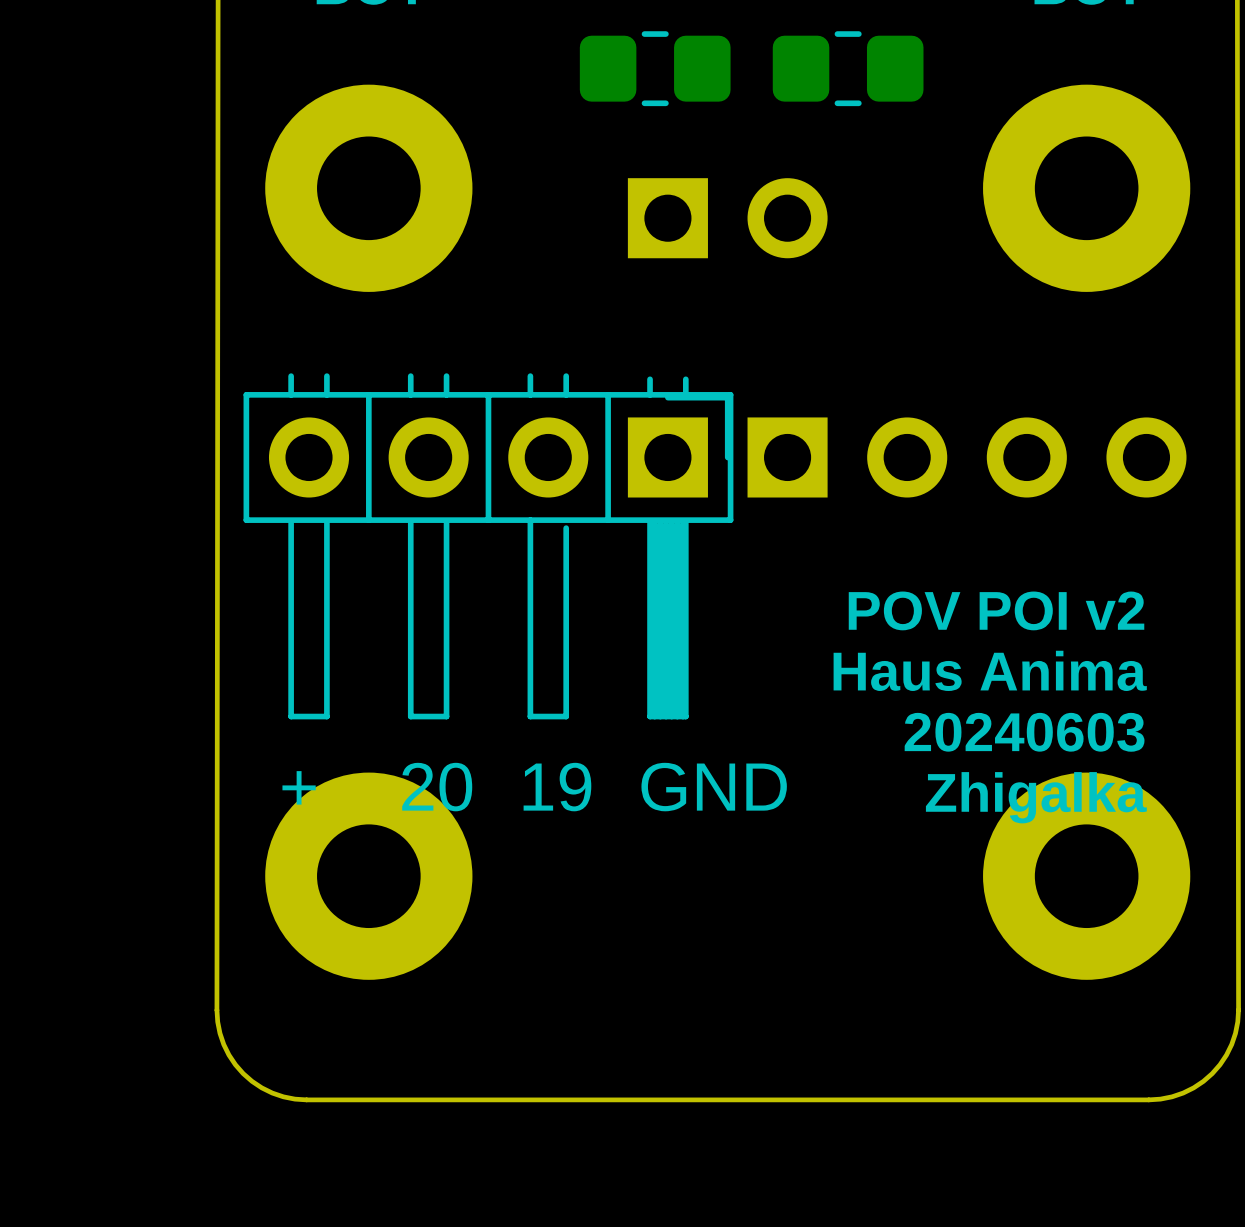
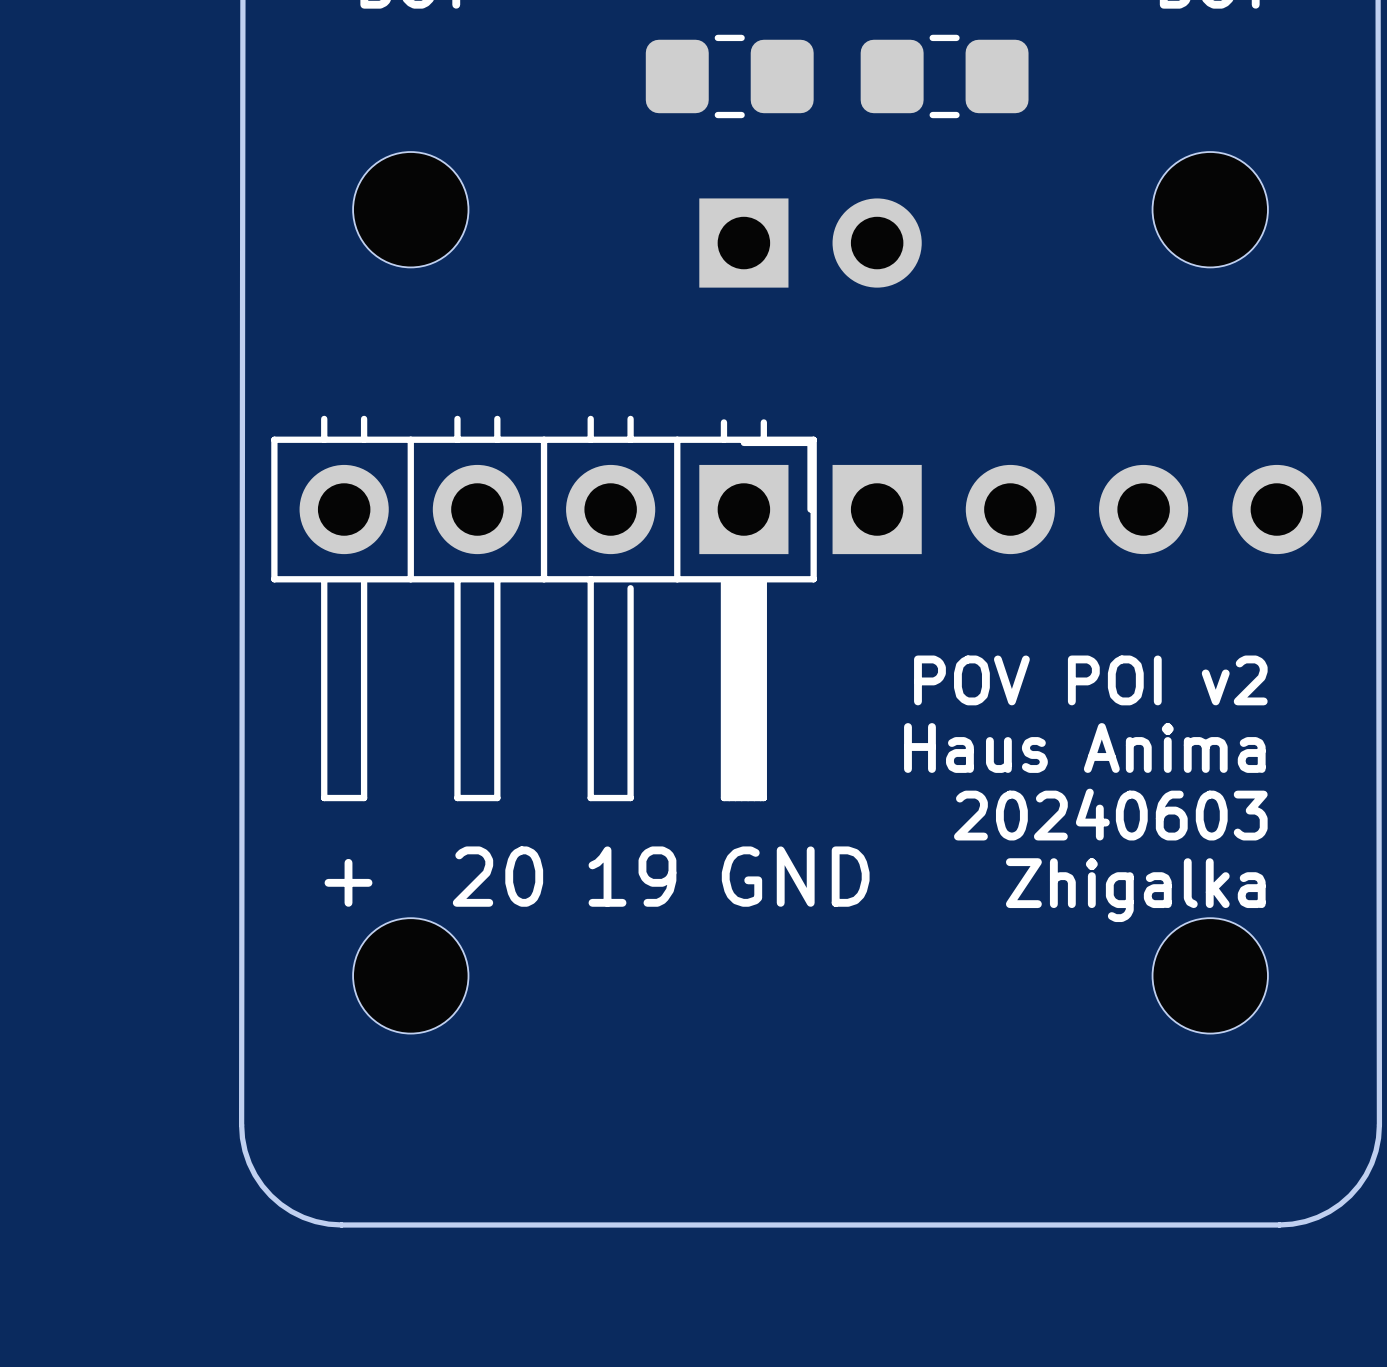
part footprint: [265, 84, 473, 292] -> [353, 152, 469, 268]
part footprint: [983, 84, 1191, 292] -> [1152, 152, 1268, 268]
part footprint: [265, 772, 473, 980] -> [353, 918, 469, 1034]
part footprint: [983, 772, 1191, 980] -> [1152, 918, 1268, 1034]

